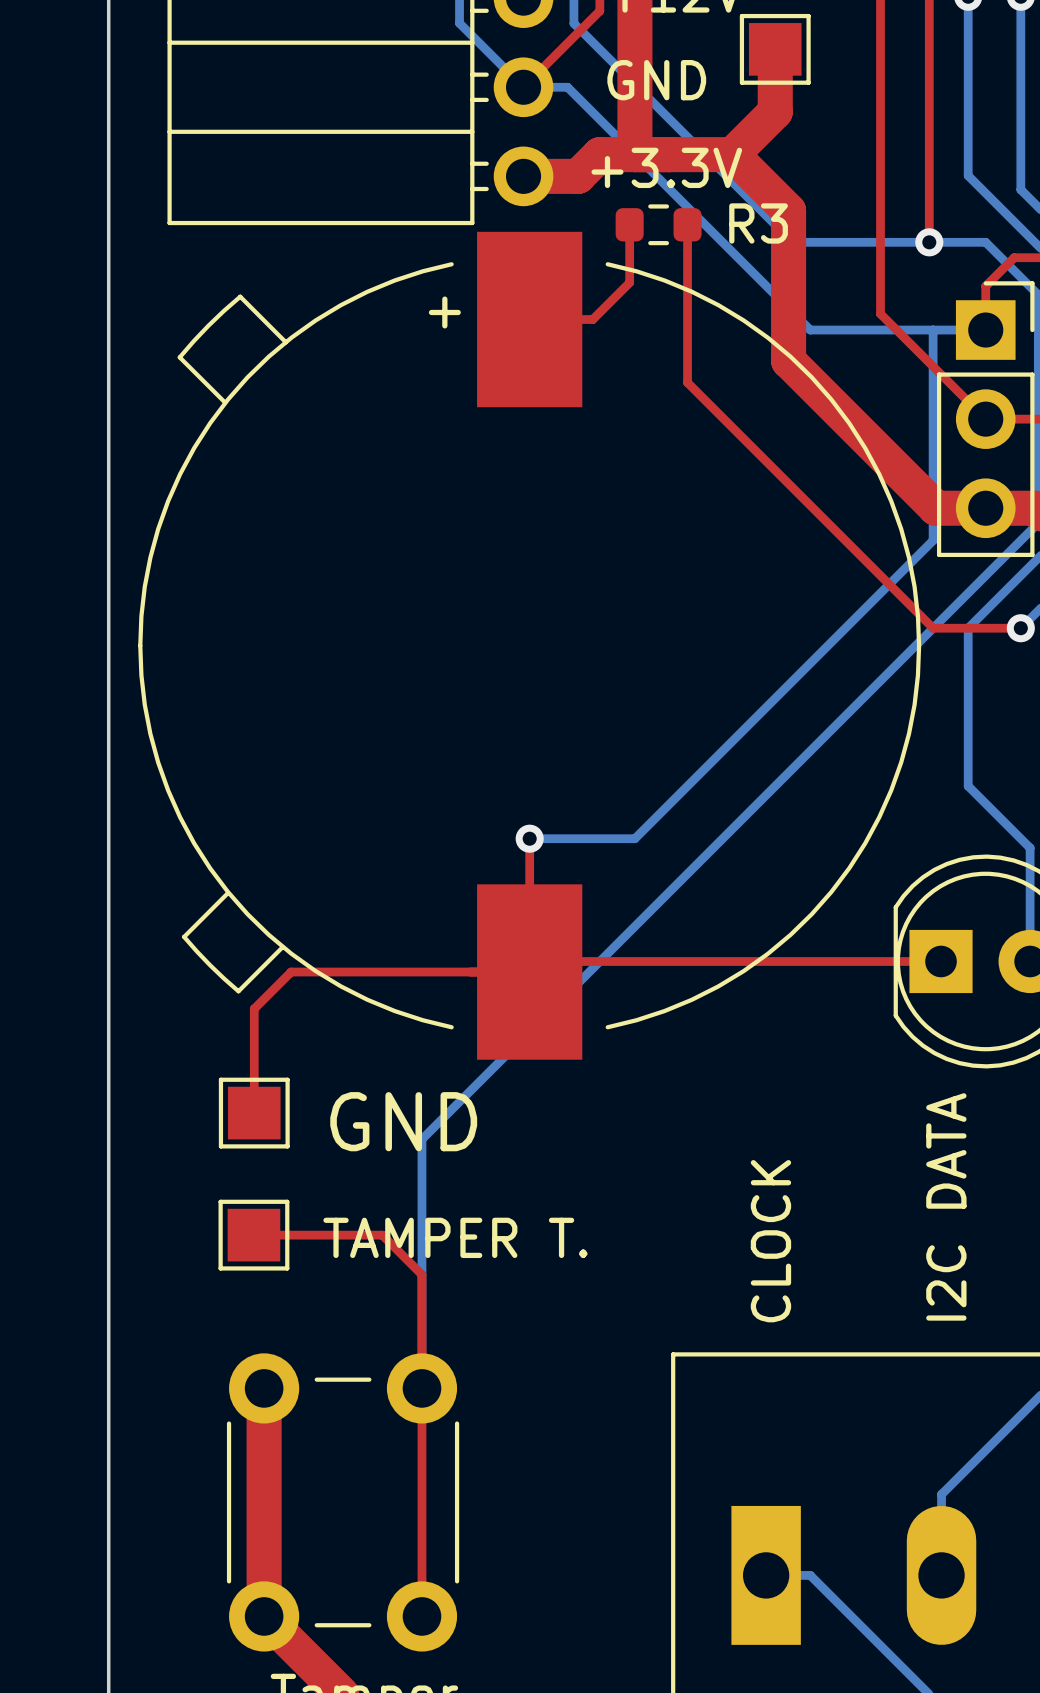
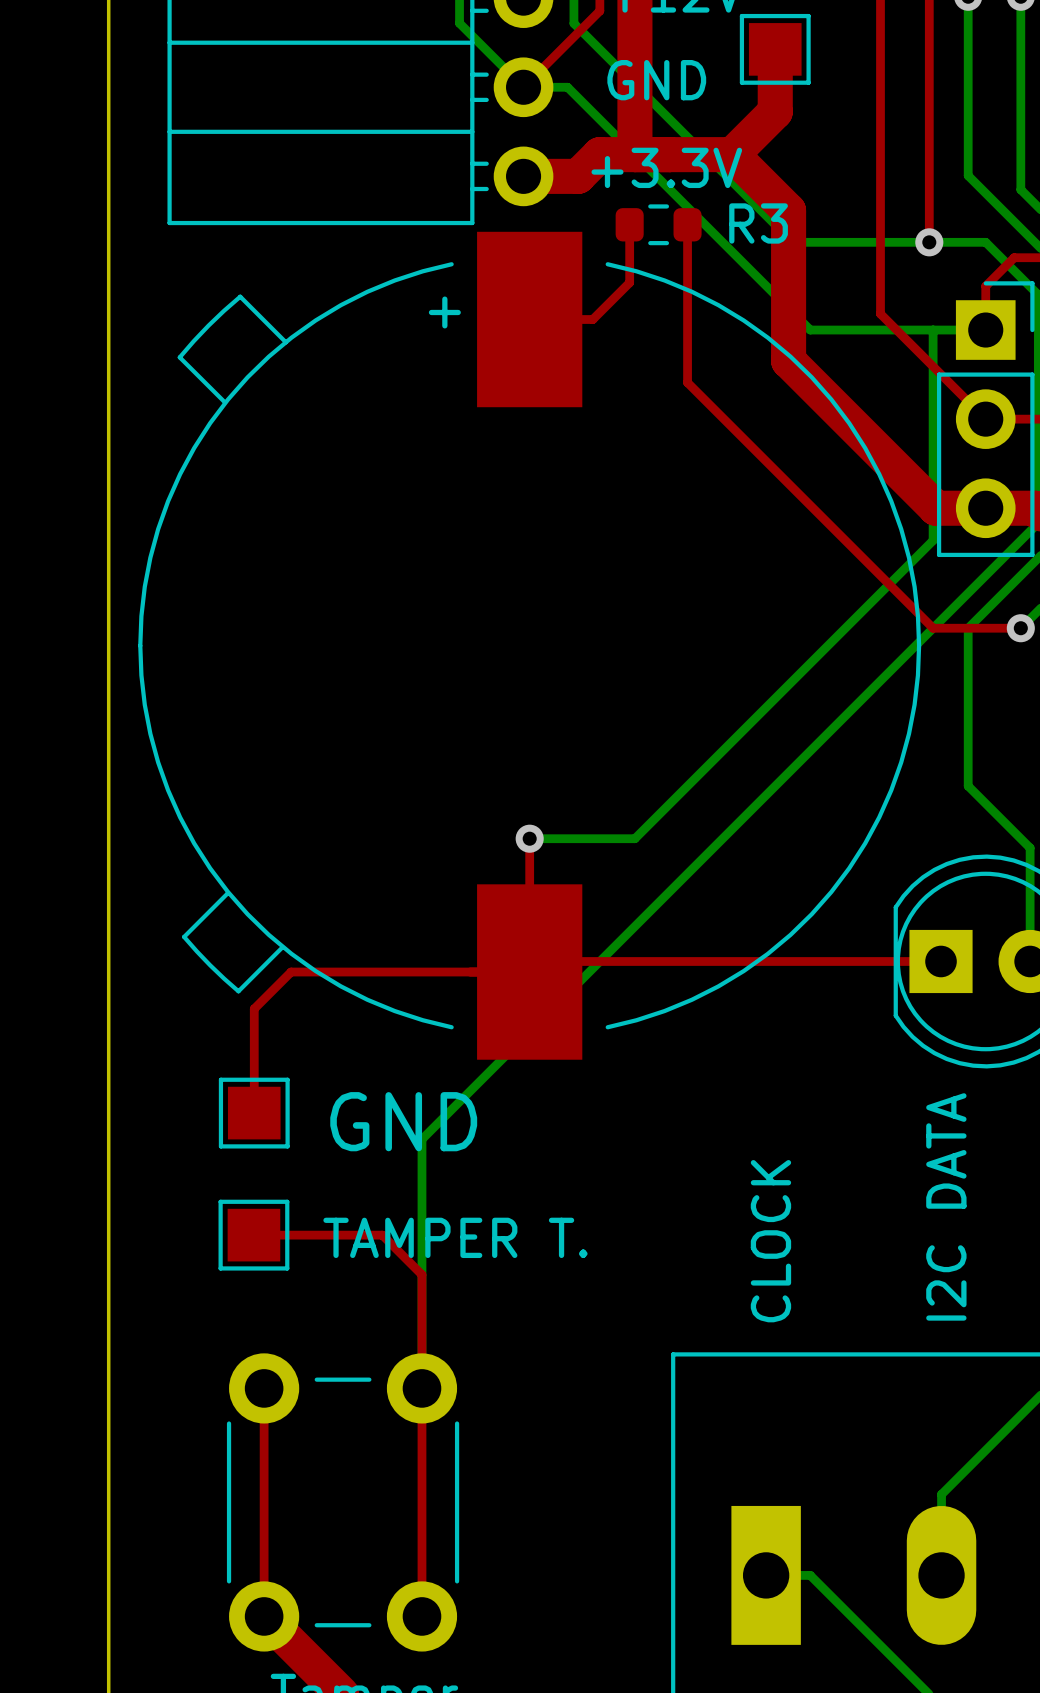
top track width: thick (264, 1388) (264, 1616) -> thin (264, 1388) (264, 1616)

